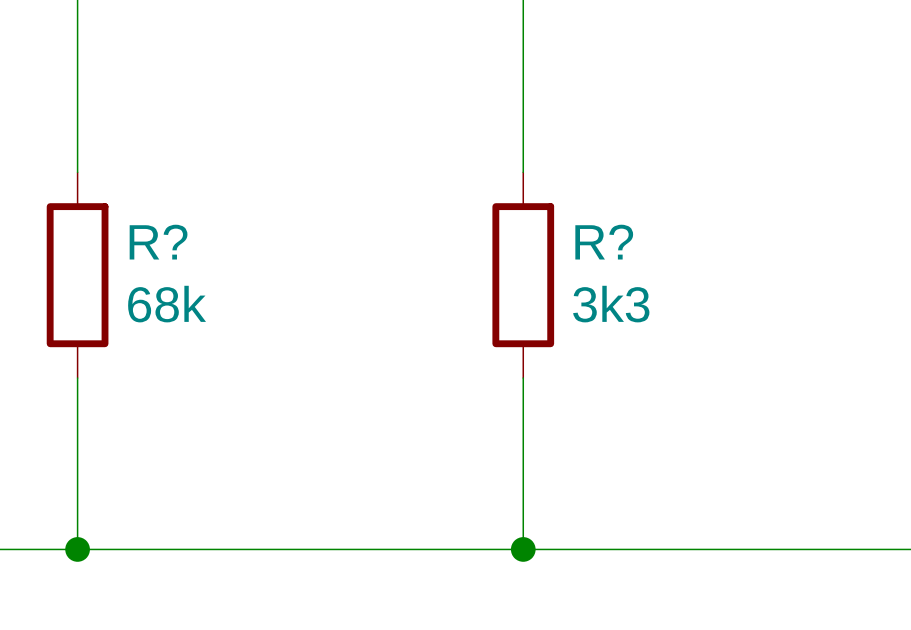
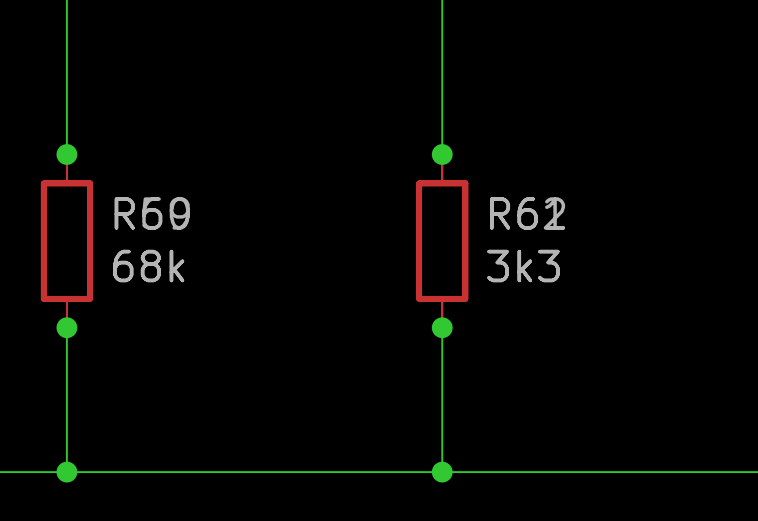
junction: none -> (66, 154)
junction: none -> (442, 154)
R?: 68k (77, 275) -> none
part: none -> 68k (66, 241)
part: none -> 68k (66, 241)
R?: 3k3 (523, 275) -> none
part: none -> 3k3 (442, 241)
part: none -> 3k3 (442, 241)
junction: none -> (66, 327)
junction: none -> (442, 327)

